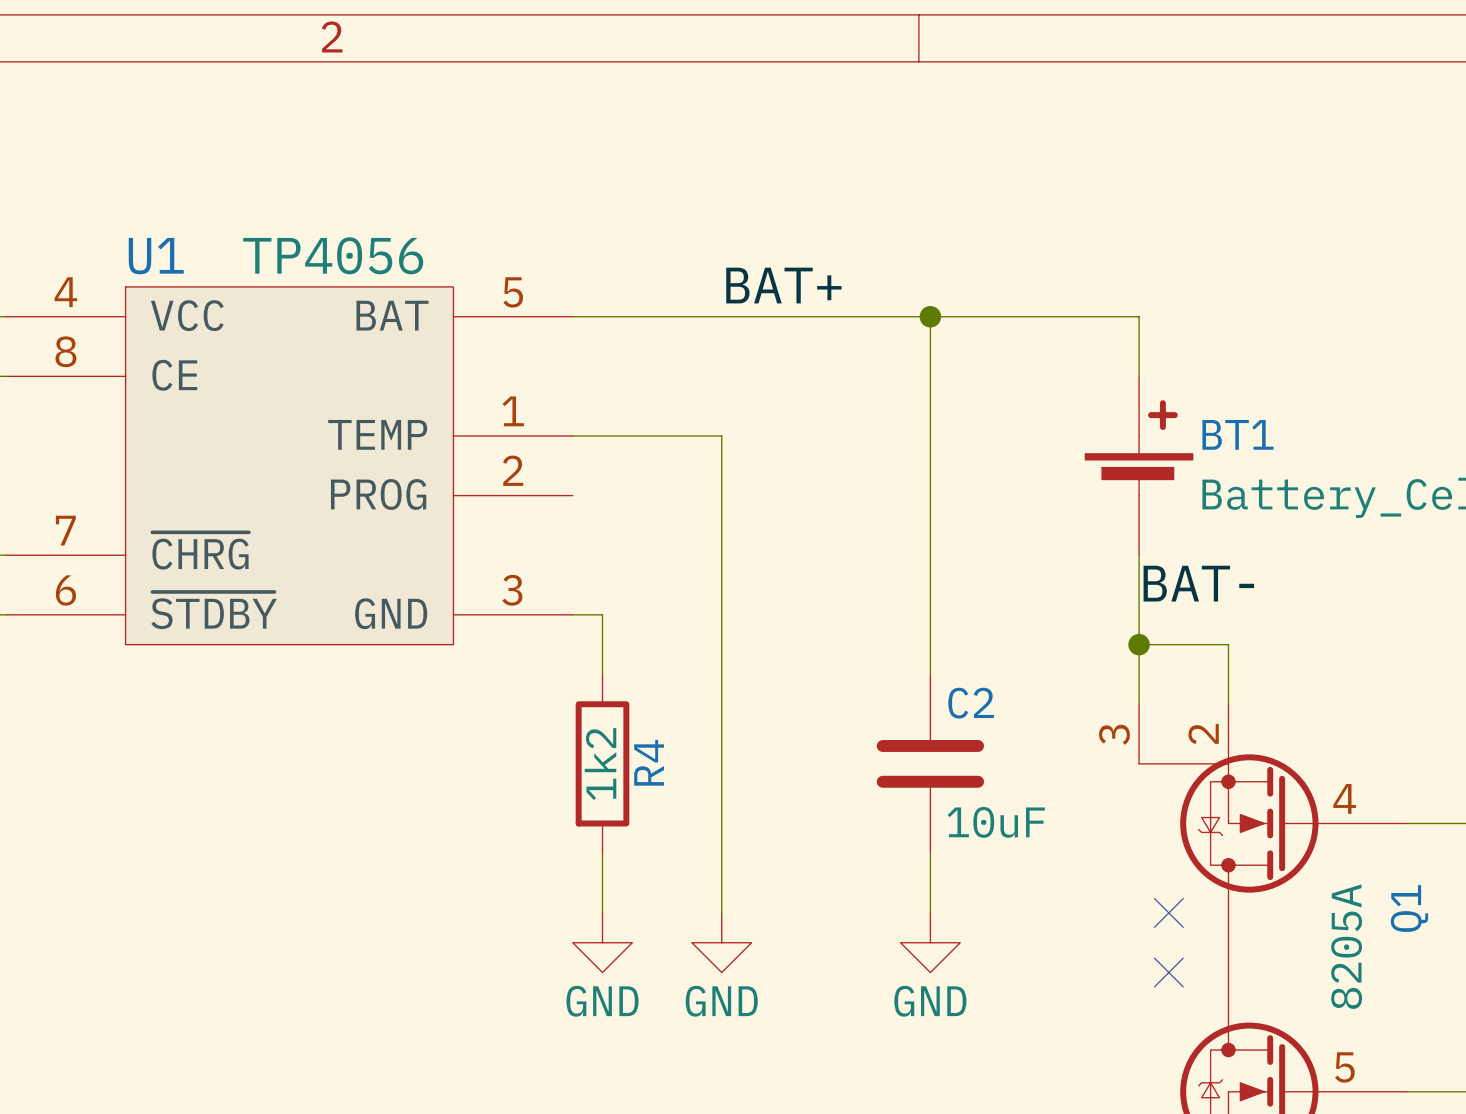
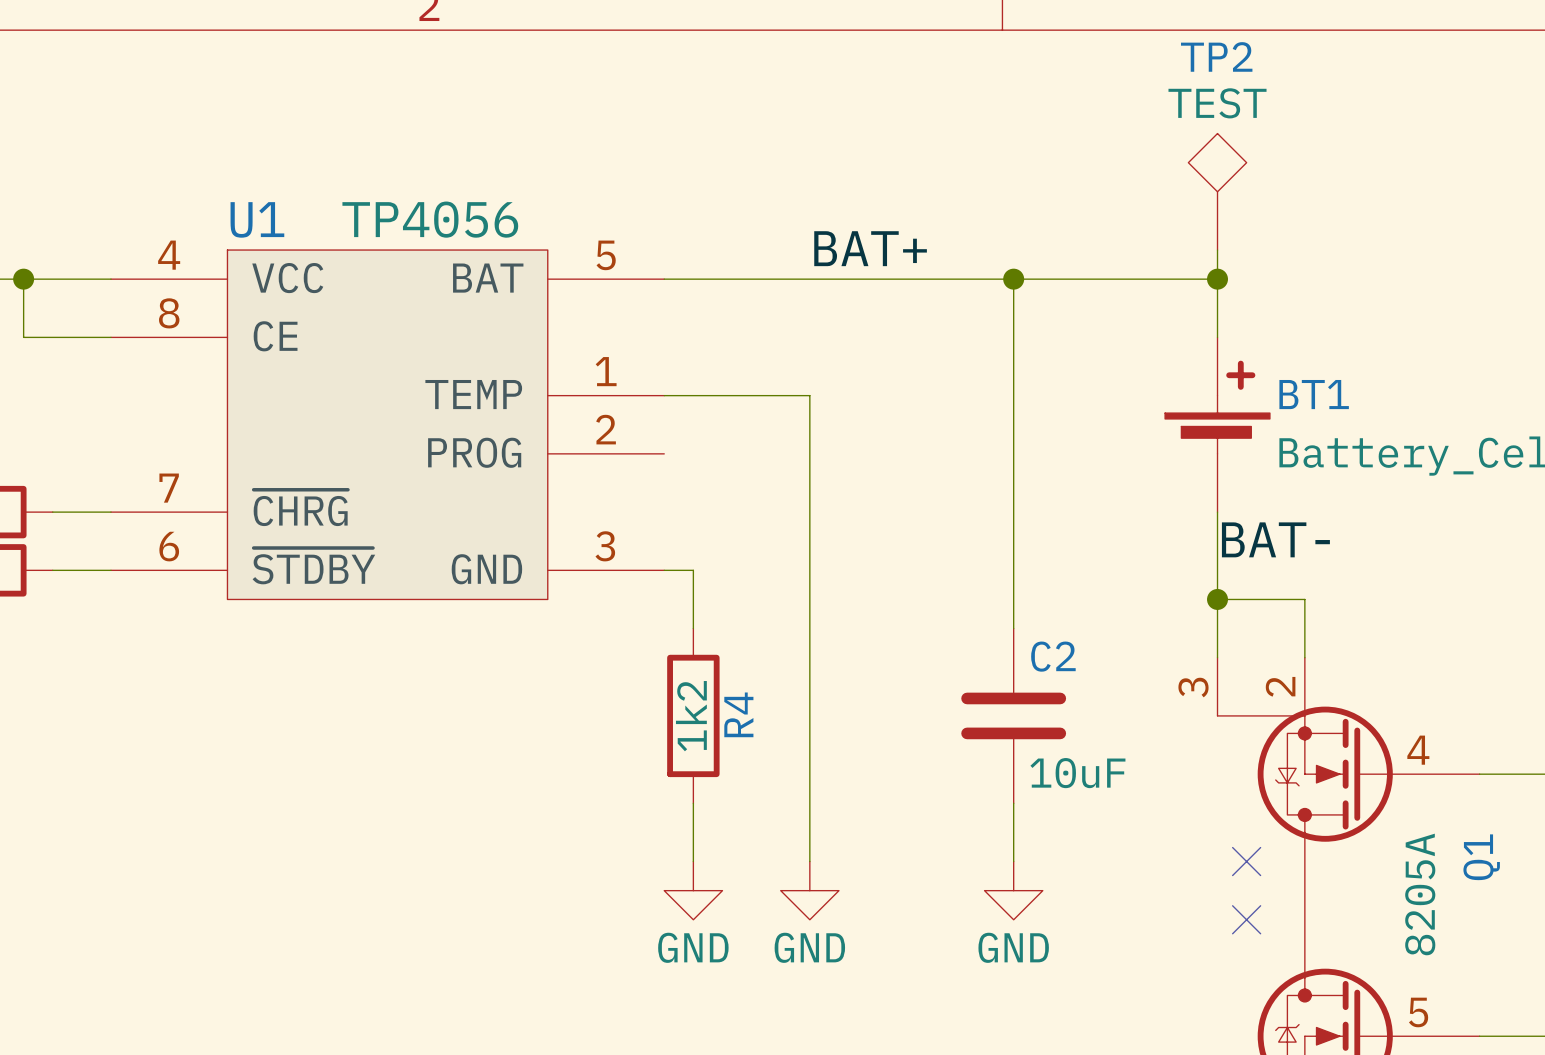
TP2: none -> TEST (1217, 191)
wire: none -> (1217, 250) (1217, 279)
junction: none -> (1217, 279)

